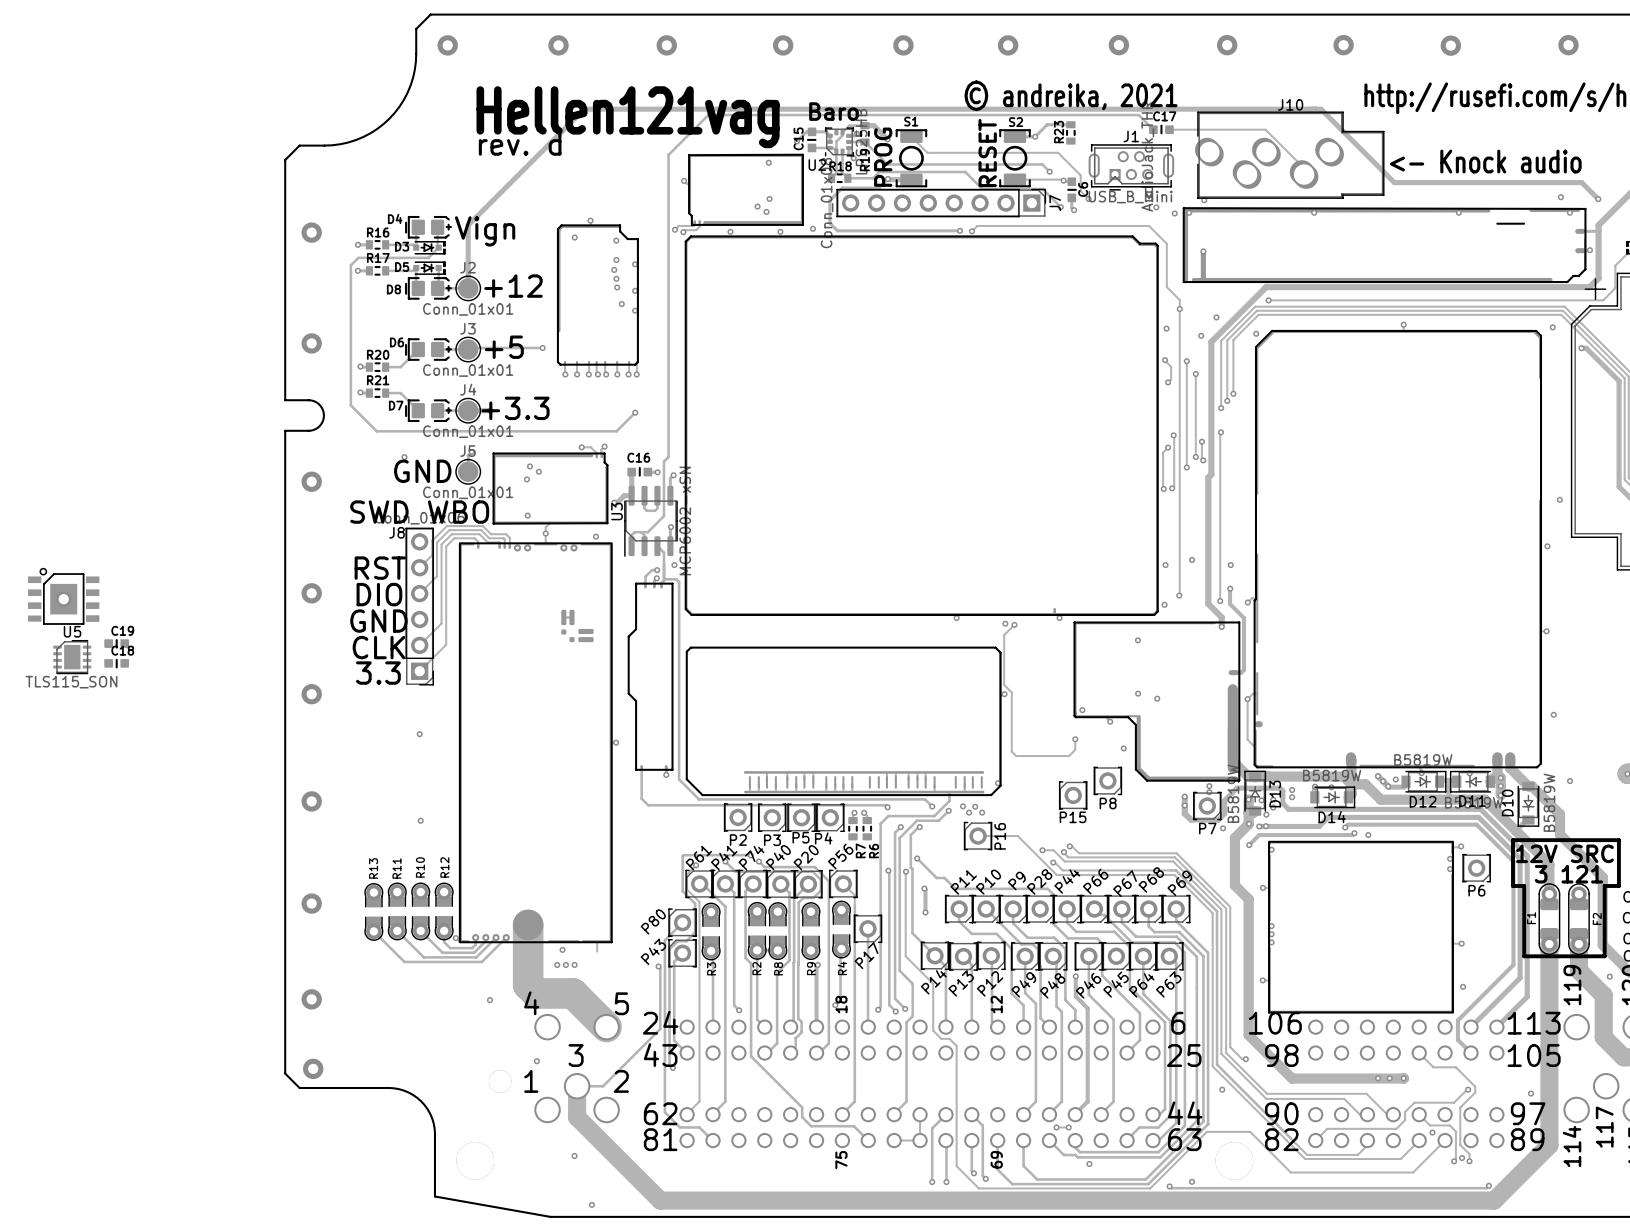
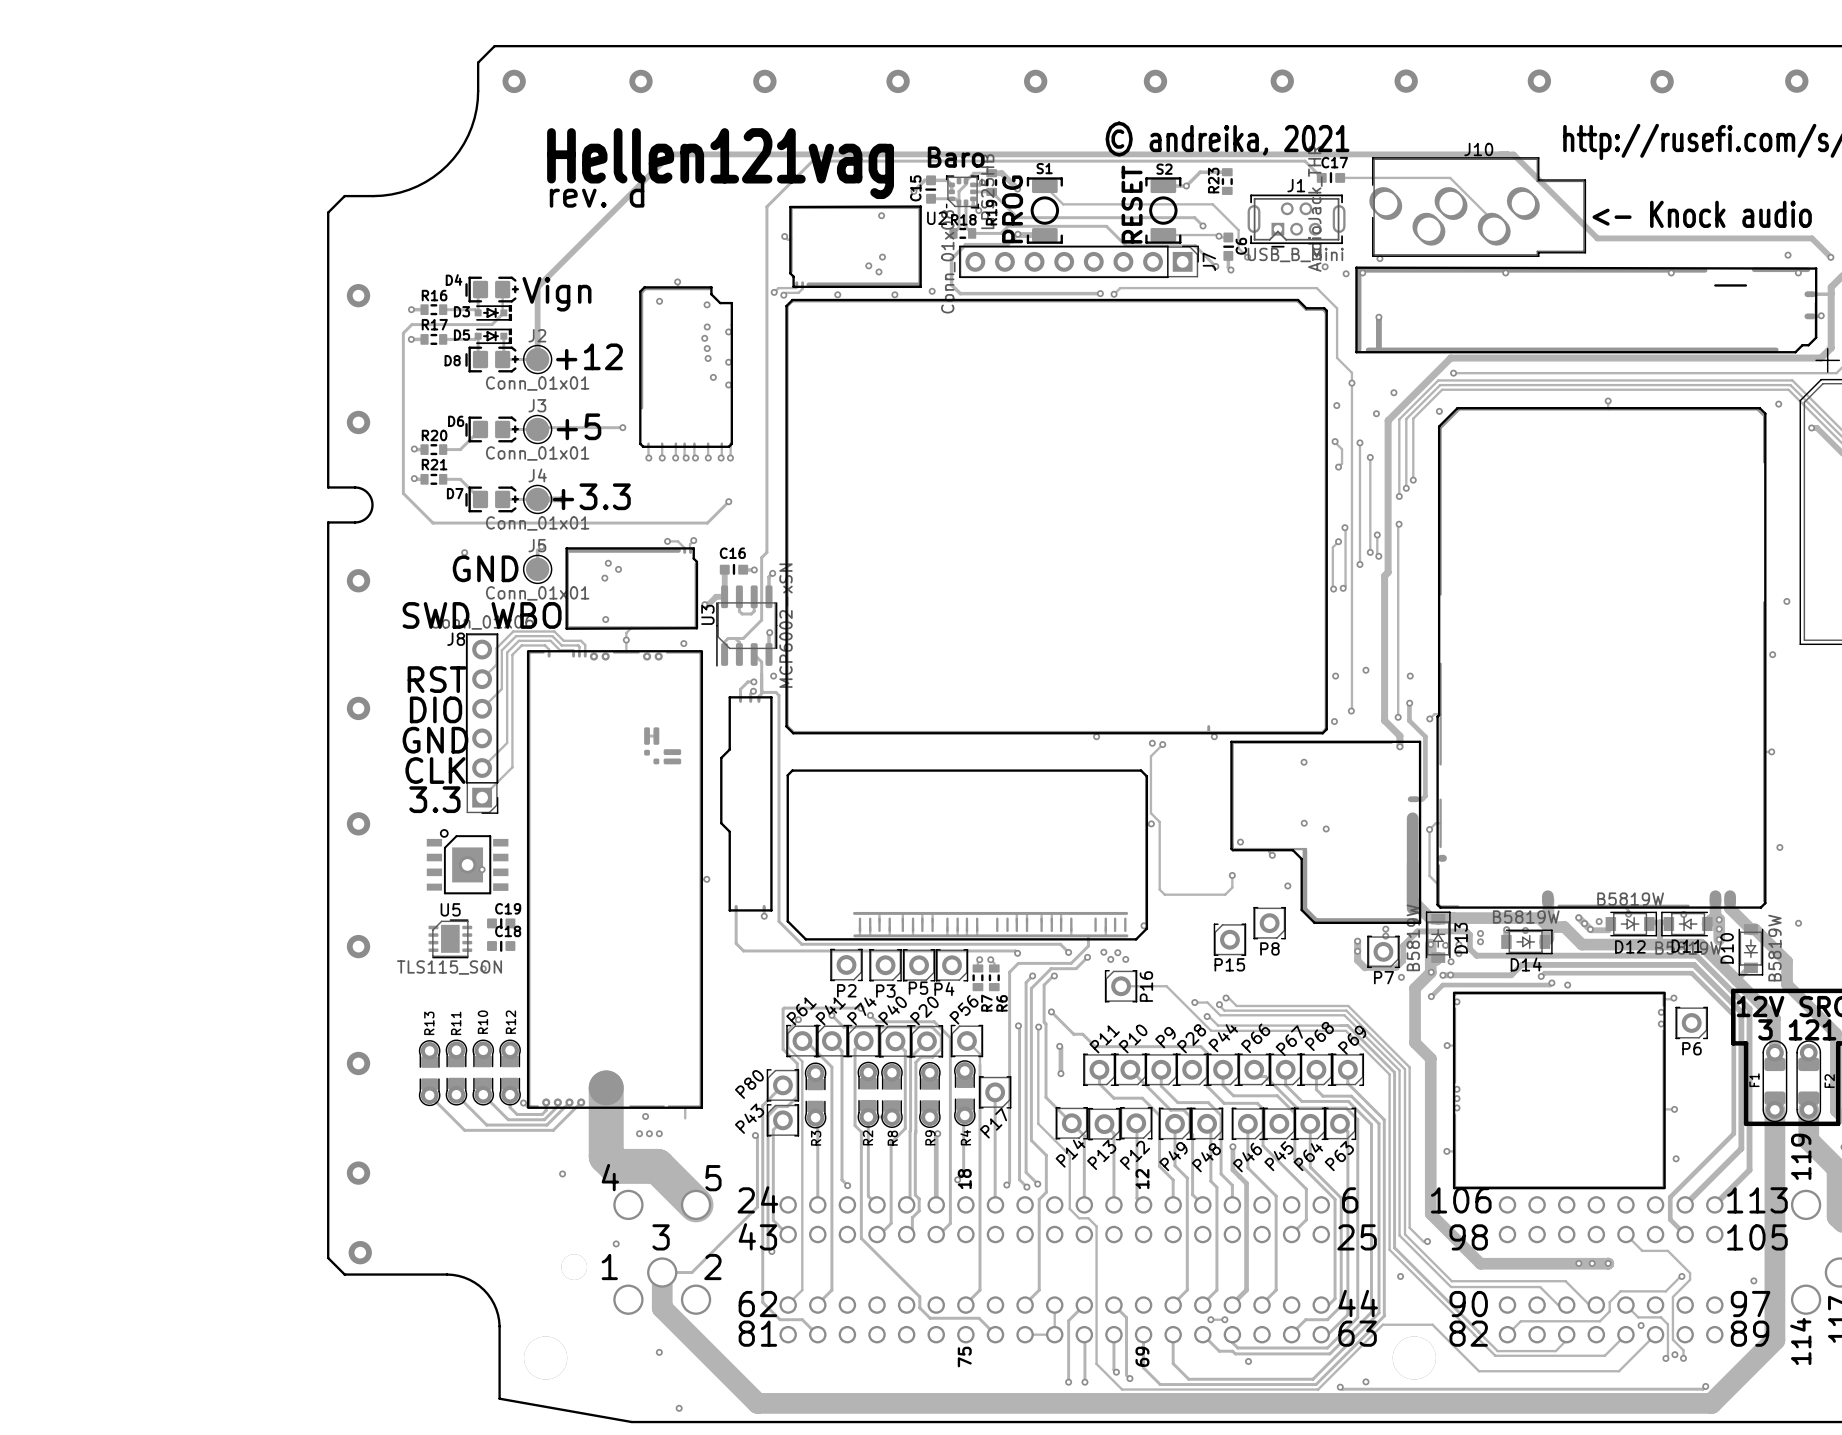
part: (63, 596) -> none
C19 position: (116, 643) -> (501, 923)
U5 position: (72, 657) -> (450, 938)
C18 position: (116, 663) -> (501, 946)
part: none -> (467, 861)

